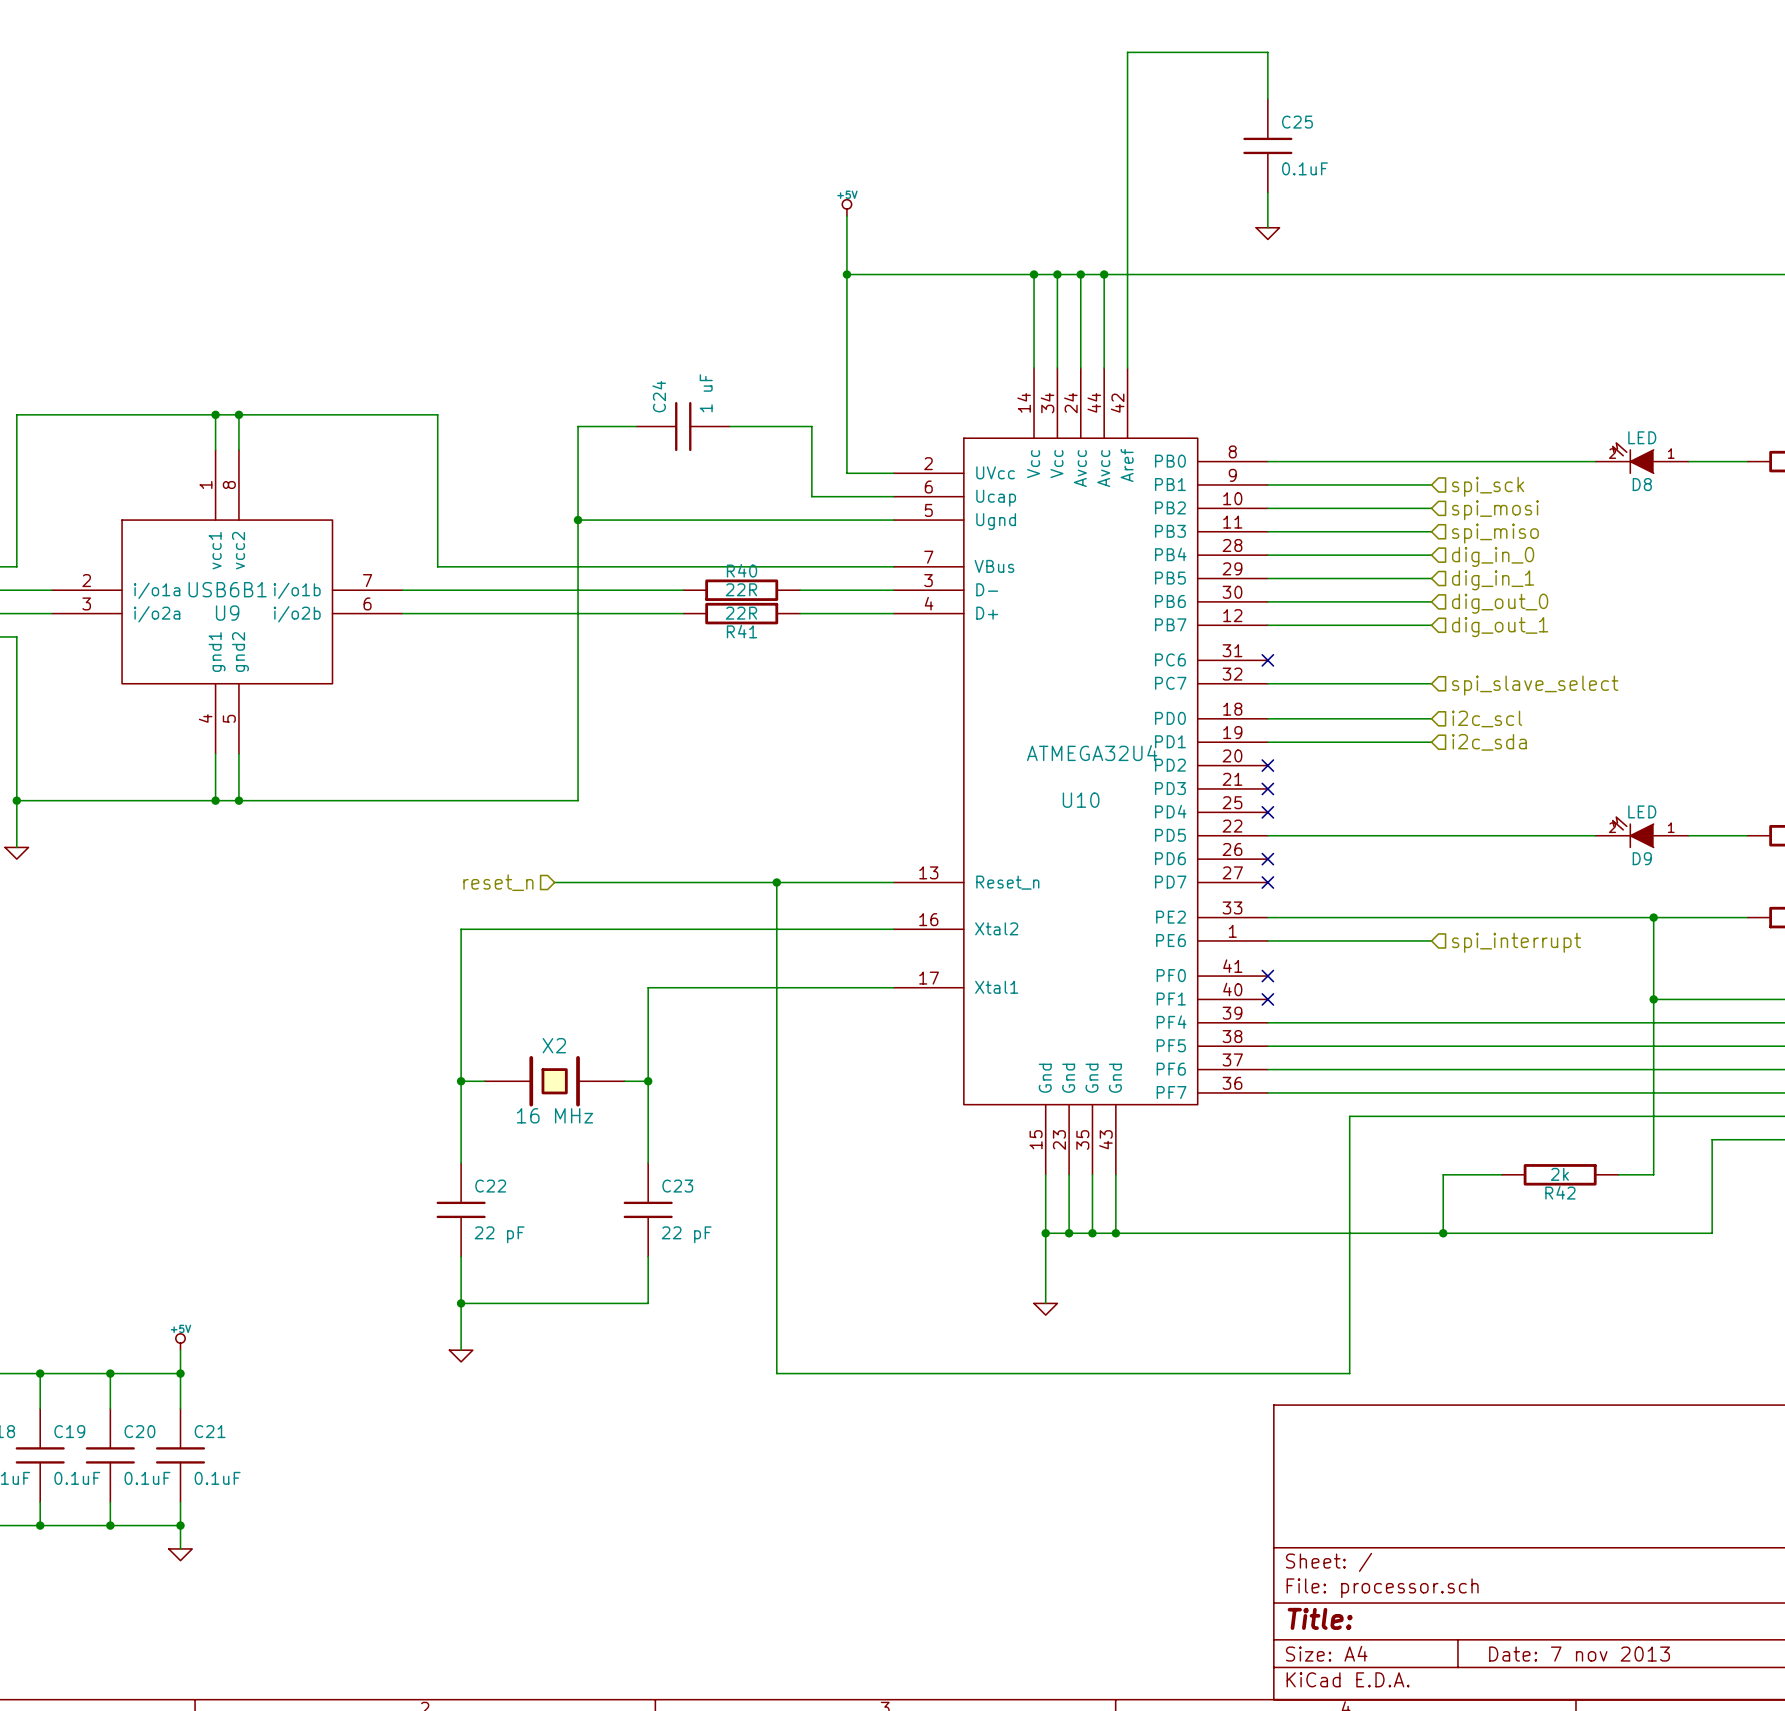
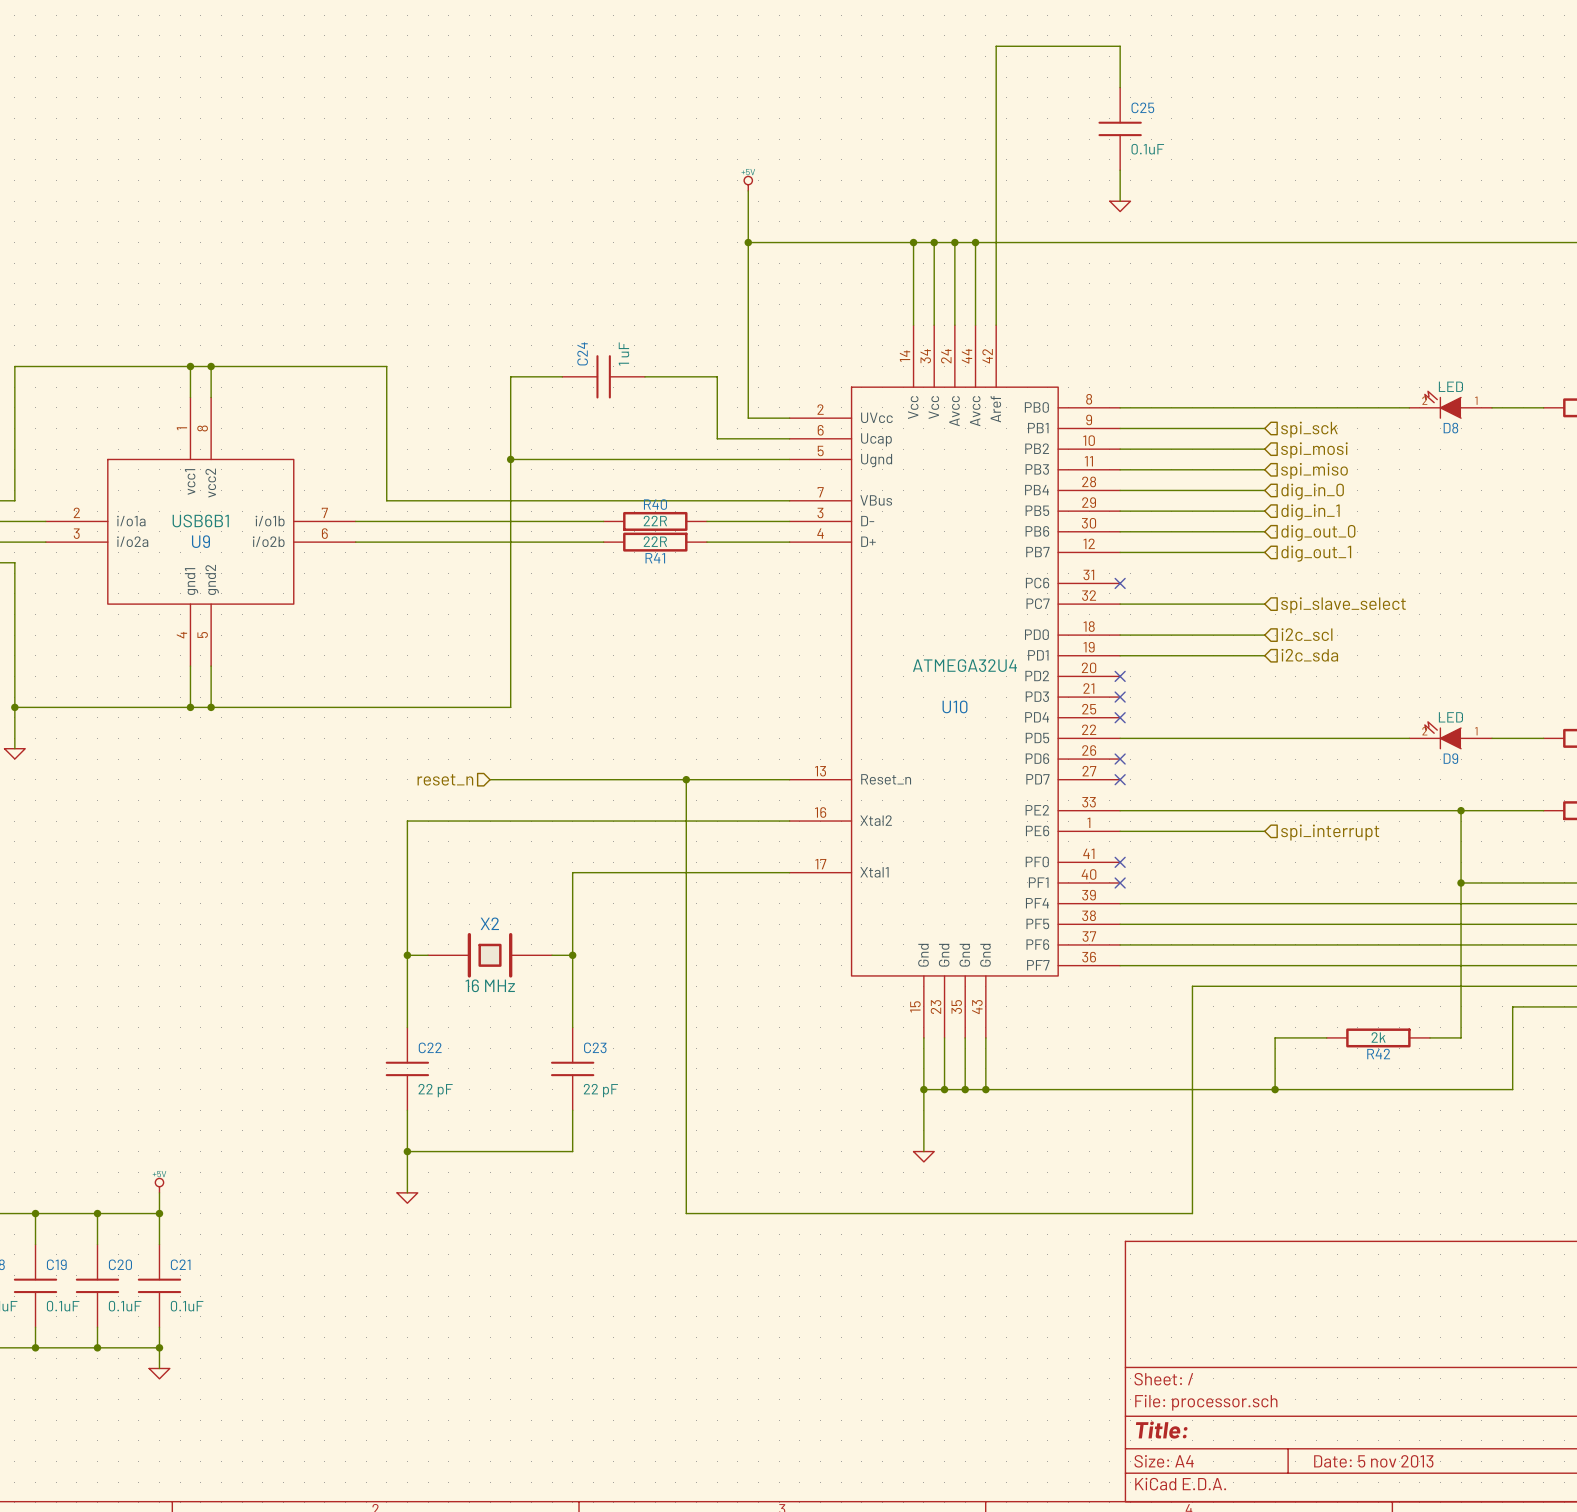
title block: Date: 7 nov 2013 (1579, 1654) -> Date: 5 nov 2013 (1373, 1461)

